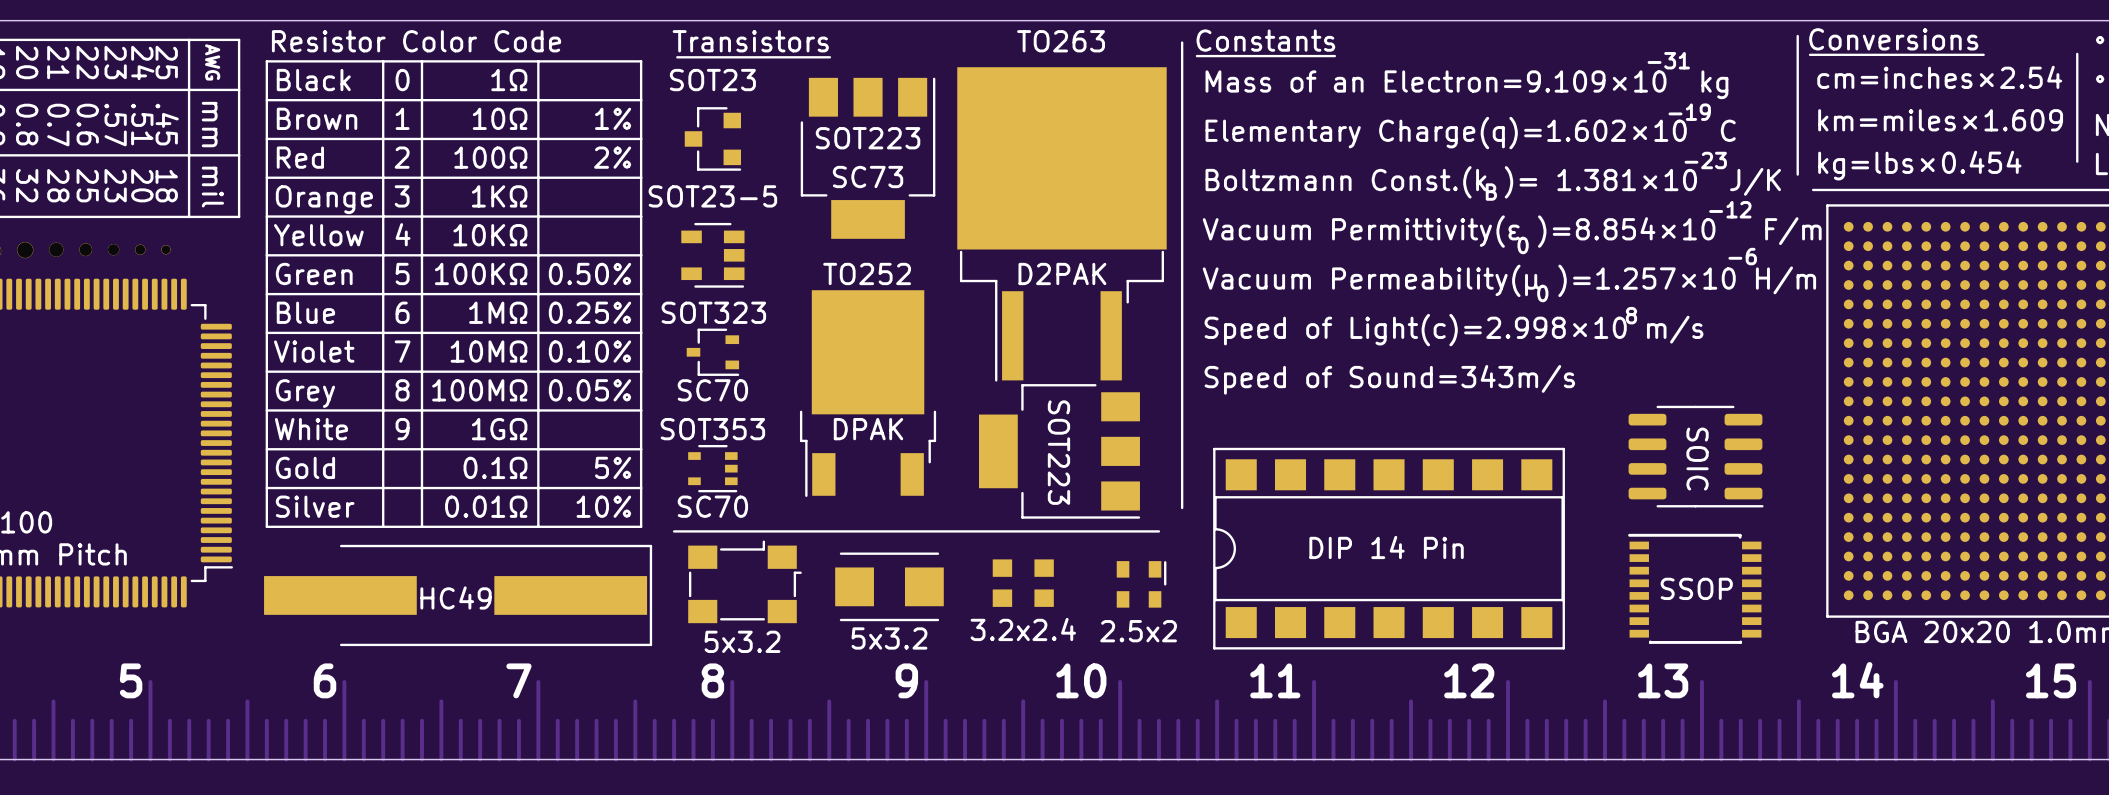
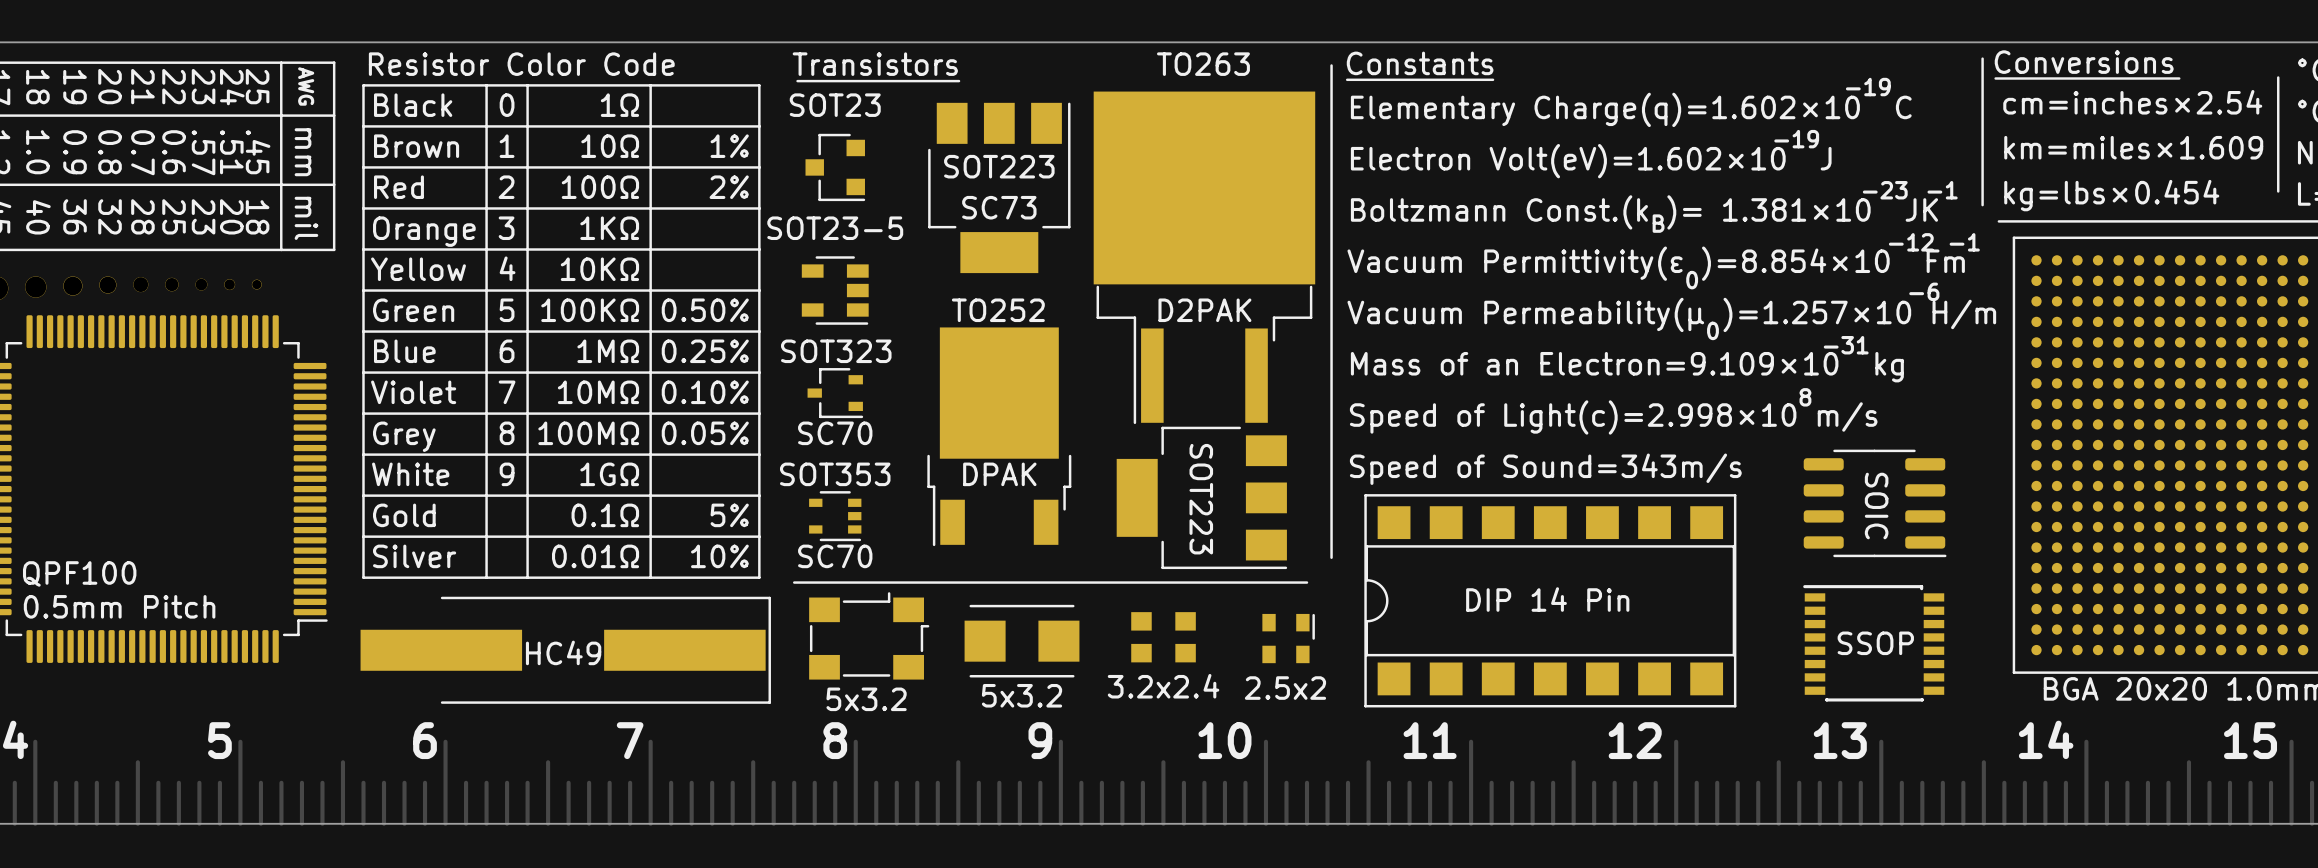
text position: -31 (1668, 60) -> -31 (1846, 345)
text: none -> -19 (1868, 87)
text position: Mass of an Electron=9.109×10 kg (1466, 84) -> Mass of an Electron=9.109×10 kg (1627, 367)
text: none -> -19 (1796, 139)
text: -19 (1689, 112) -> none
text: none -> Electron Volt(eV)=1.602×10 J (1591, 161)
text position: Elementary Charge(q)=1.602×10 C (1470, 133) -> Elementary Charge(q)=1.602×10 C (1631, 109)
text: none -> -1 (1942, 190)
text: Boltzmann Const.(k )= 1.381×10 J/K (1493, 182) -> Boltzmann Const.(k )= 1.381×10 JK (1644, 212)
text: none -> -1 (1964, 242)
text: Vacuum Permittivity(ε )=8.854×10 F/m (1512, 231) -> Vacuum Permittivity(ε )=8.854×10 Fm (1656, 263)
text position: Vacuum Permeability(μ )=1.257×10 H/m (1509, 280) -> Vacuum Permeability(μ )=1.257×10 H/m (1671, 314)
text position: 8 (1631, 315) -> 8 (1805, 397)
text position: Speed of Light(c)=2.998×10 m/s (1454, 330) -> Speed of Light(c)=2.998×10 m/s (1613, 417)
text position: Speed of Sound=343m/s (1389, 379) -> Speed of Sound=343m/s (1545, 469)

